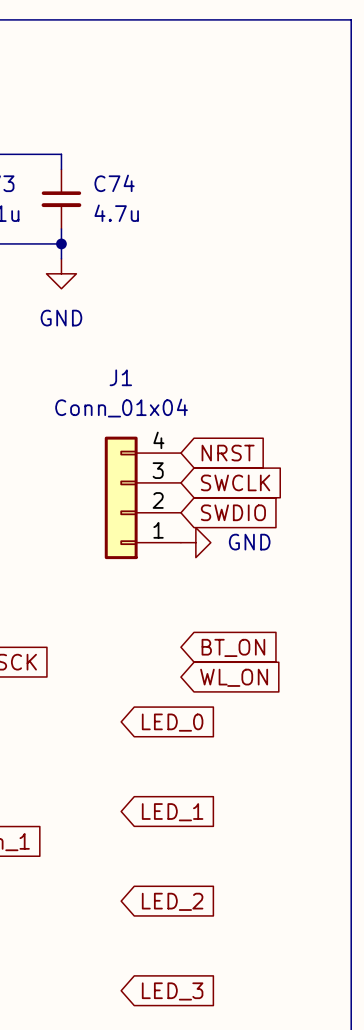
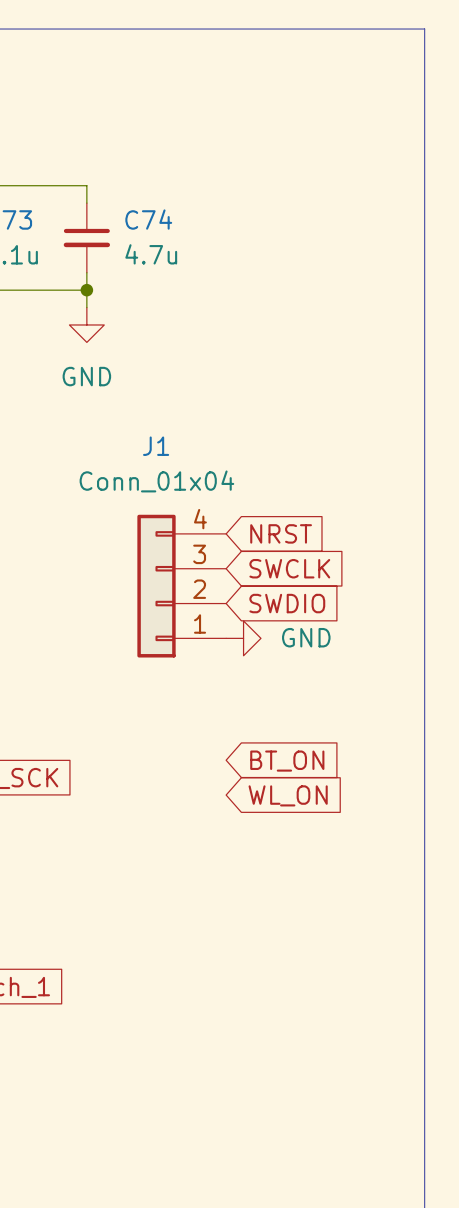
global label: LED_0 (172, 722) -> none
global label: LED_1 (172, 812) -> none
global label: LED_2 (172, 901) -> none
global label: LED_3 (172, 991) -> none

